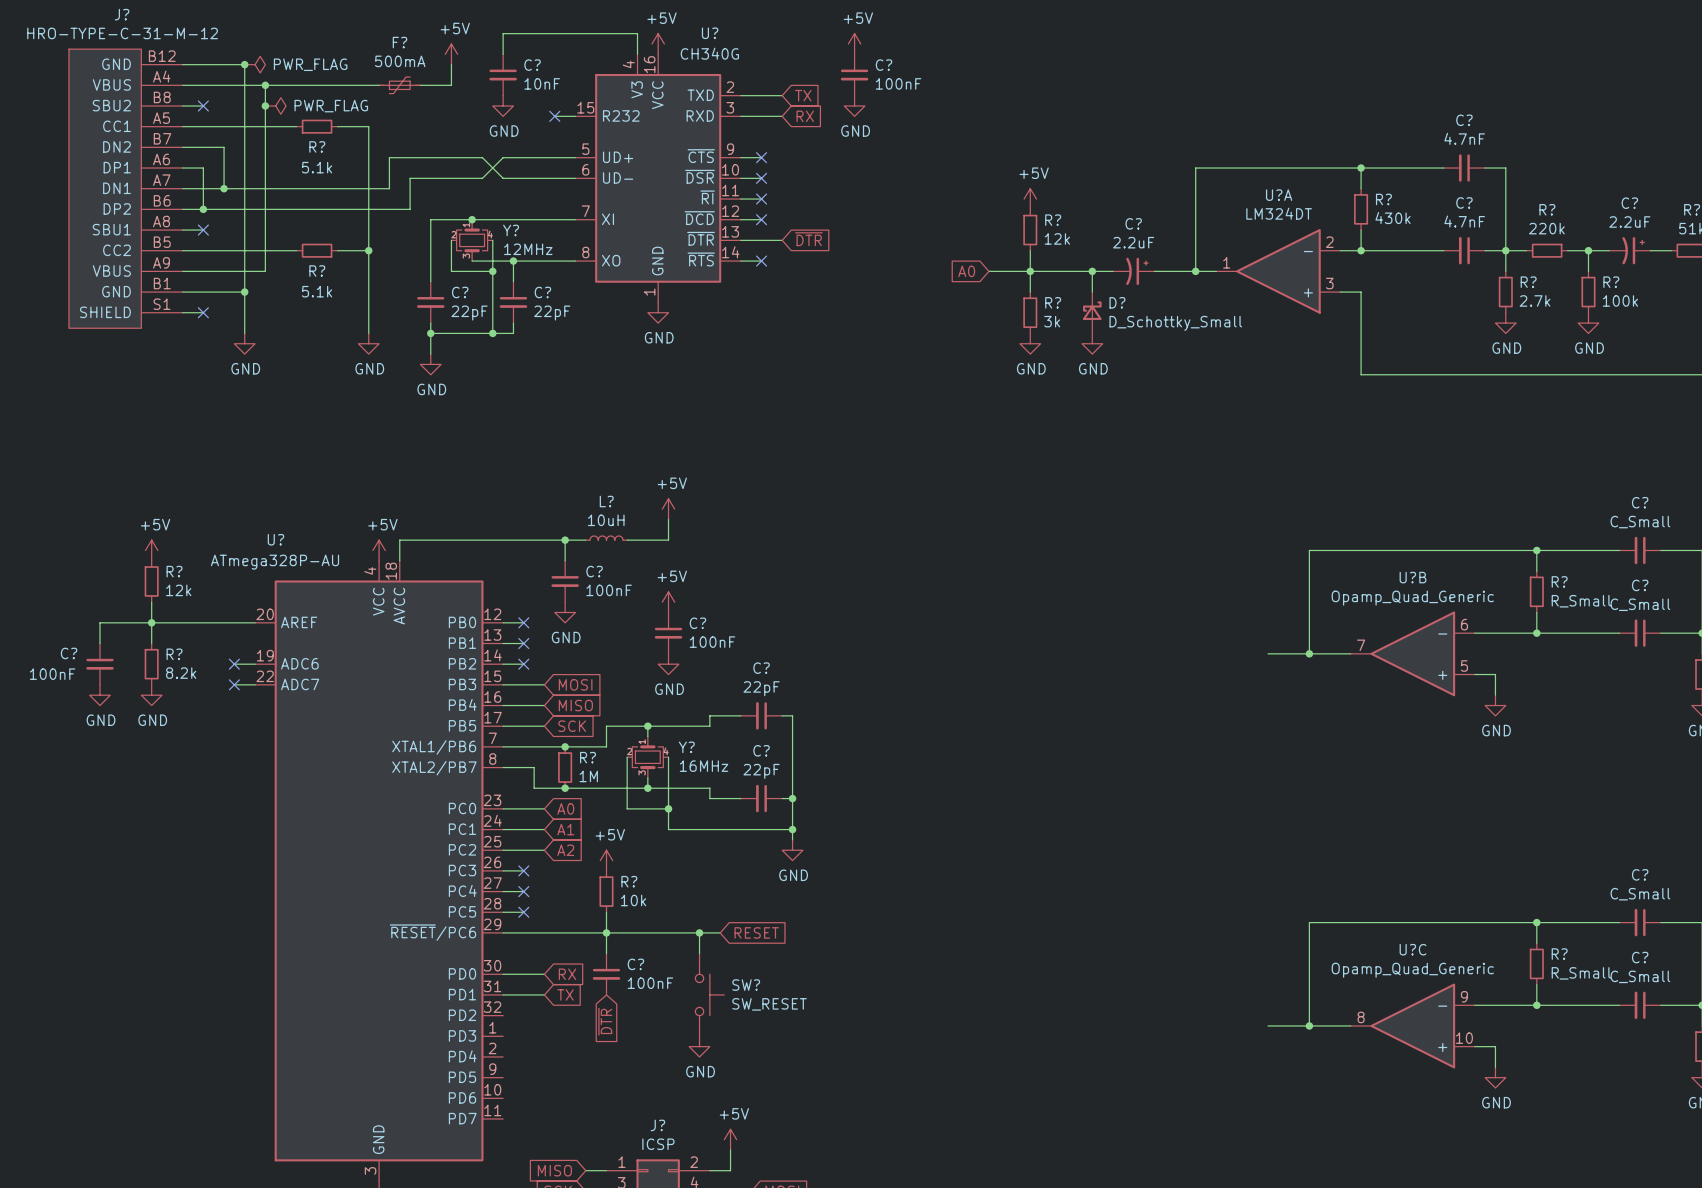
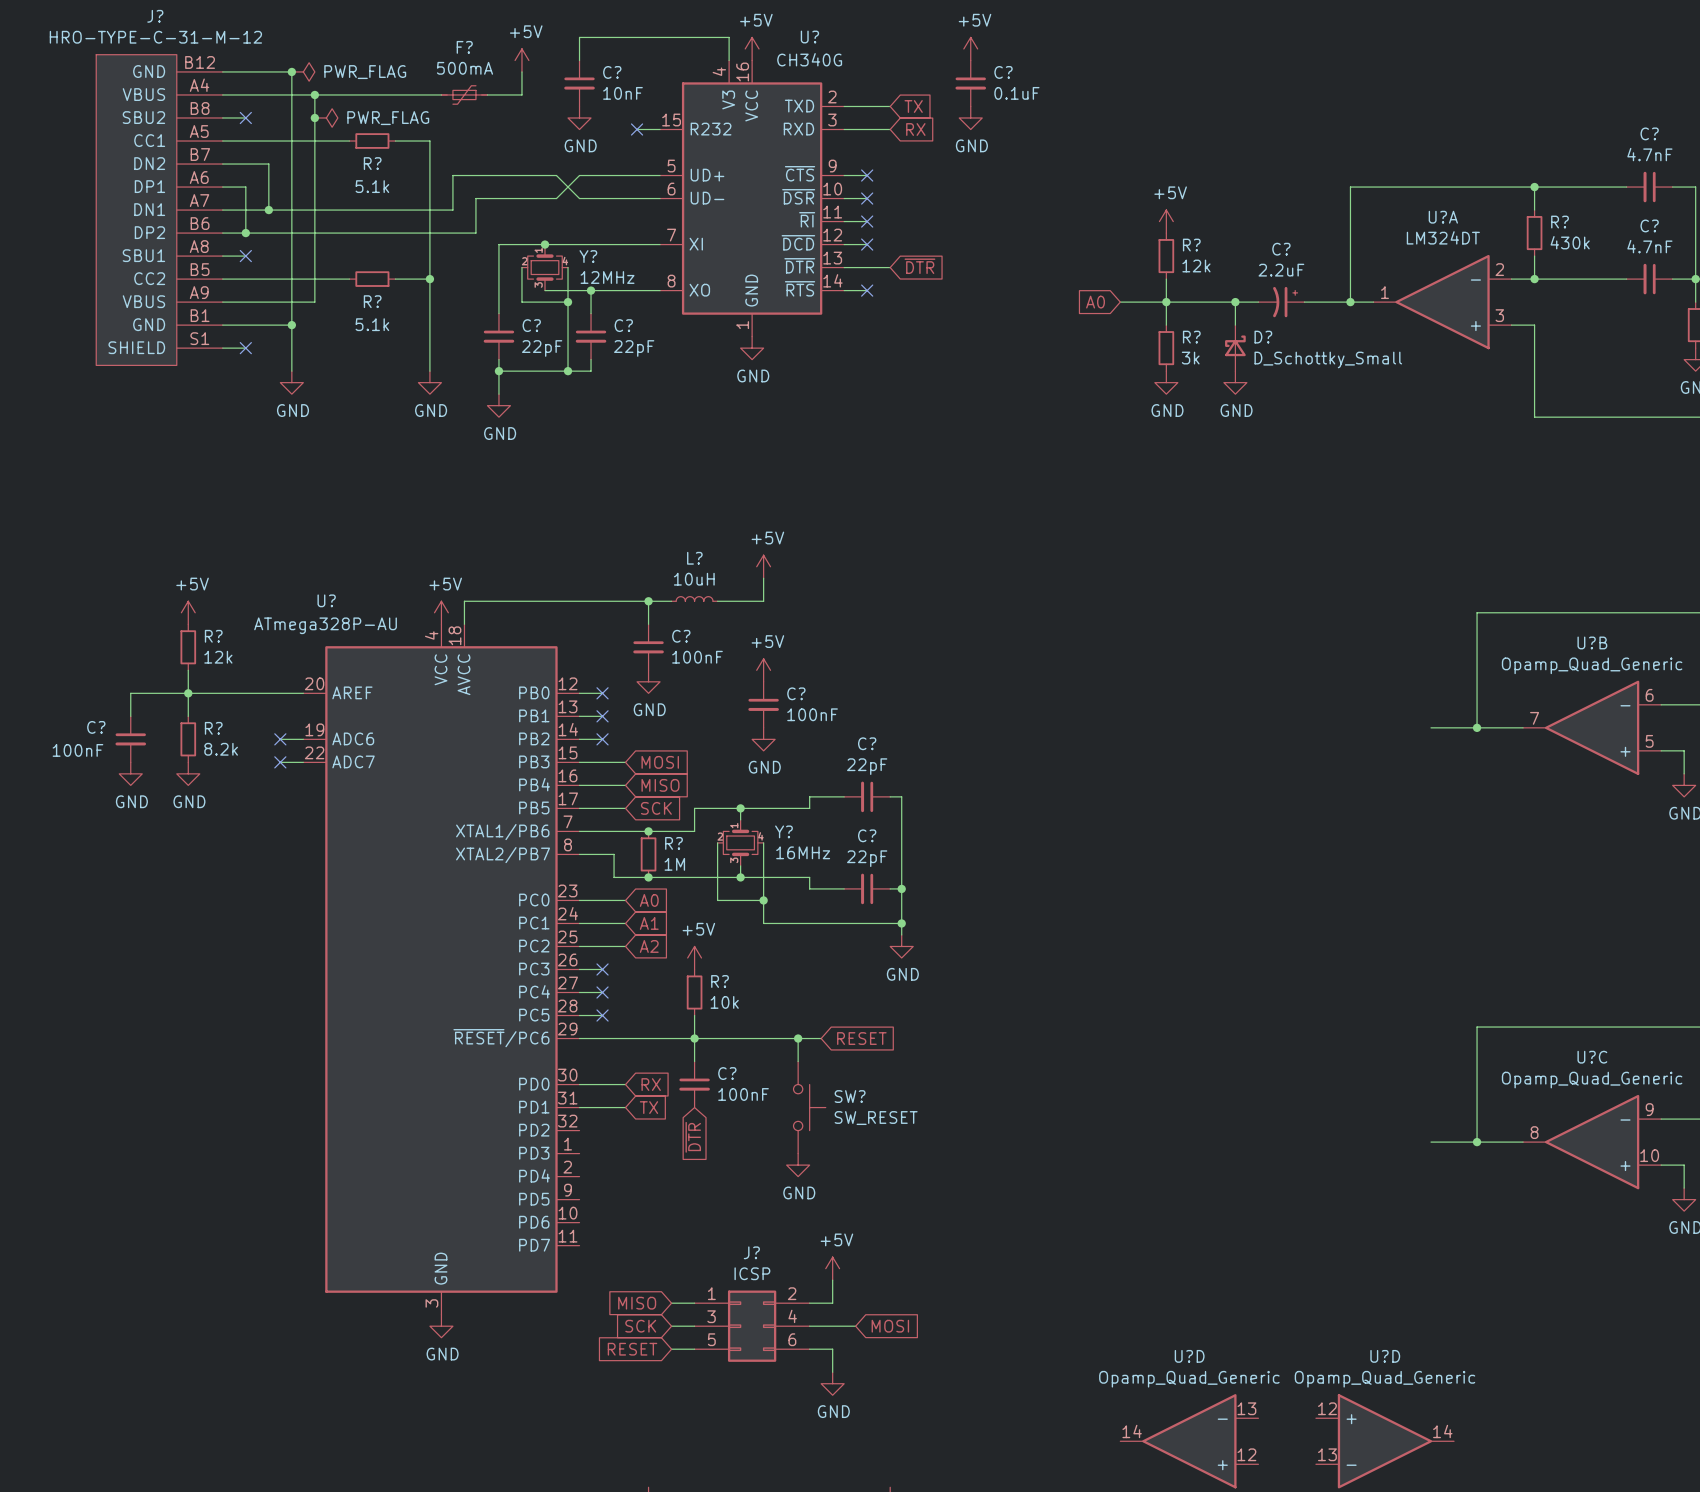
C? value: 100nF (898, 83) -> 0.1uF (1016, 93)

